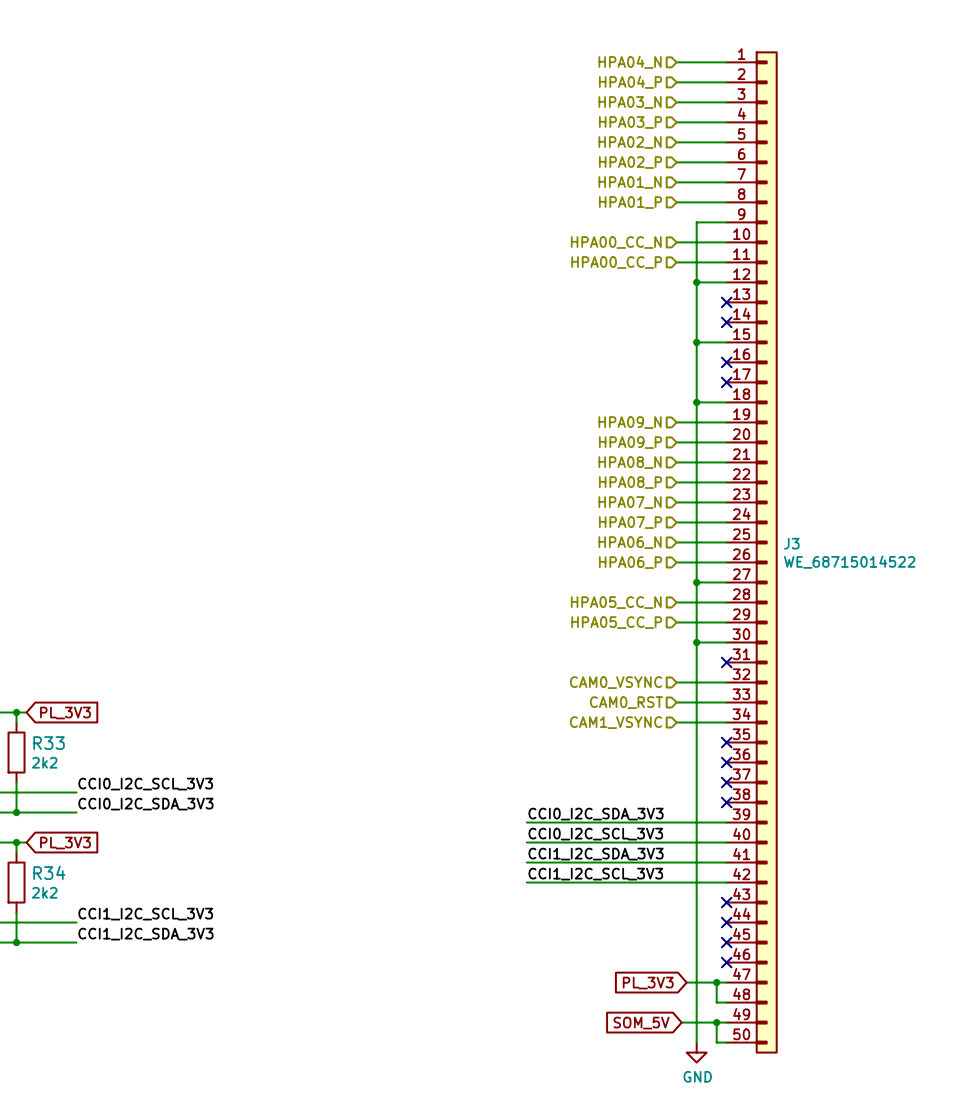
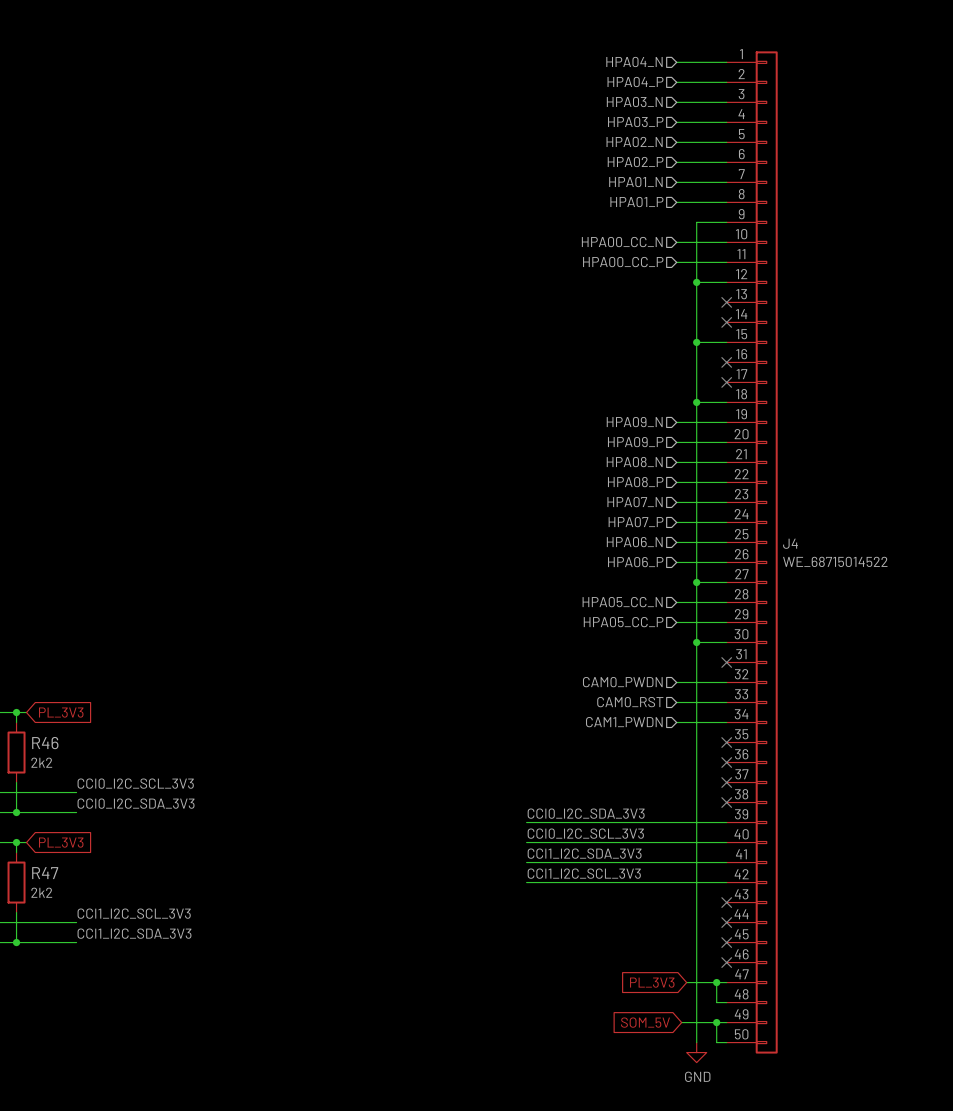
J3 name: J3 (791, 543) -> J4 (790, 543)
hierarchical label: CAM0_VSYNC (616, 682) -> CAM0_PWDN (622, 682)
hierarchical label: CAM1_VSYNC (616, 722) -> CAM1_PWDN (624, 722)
R33 name: R33 (49, 743) -> R46 (45, 743)
R34 name: R34 (49, 872) -> R47 (45, 873)

